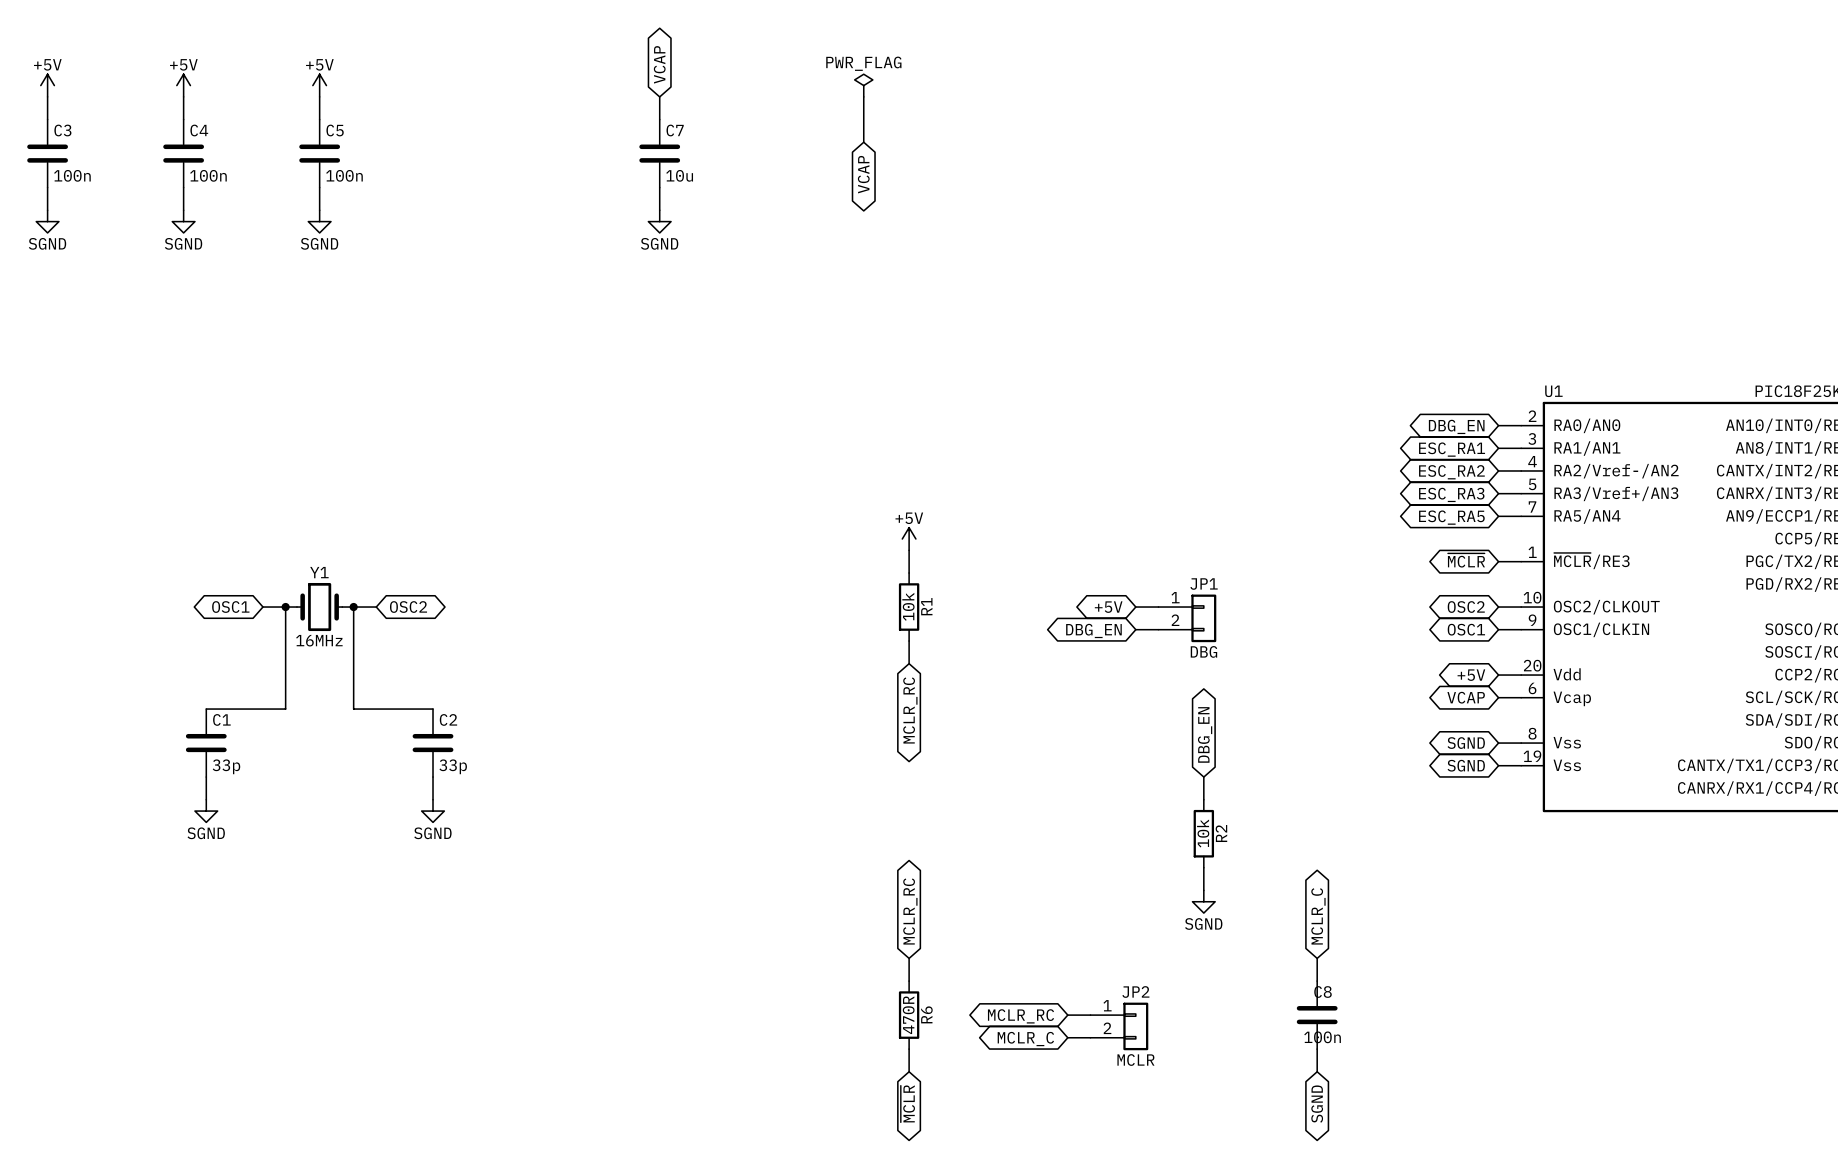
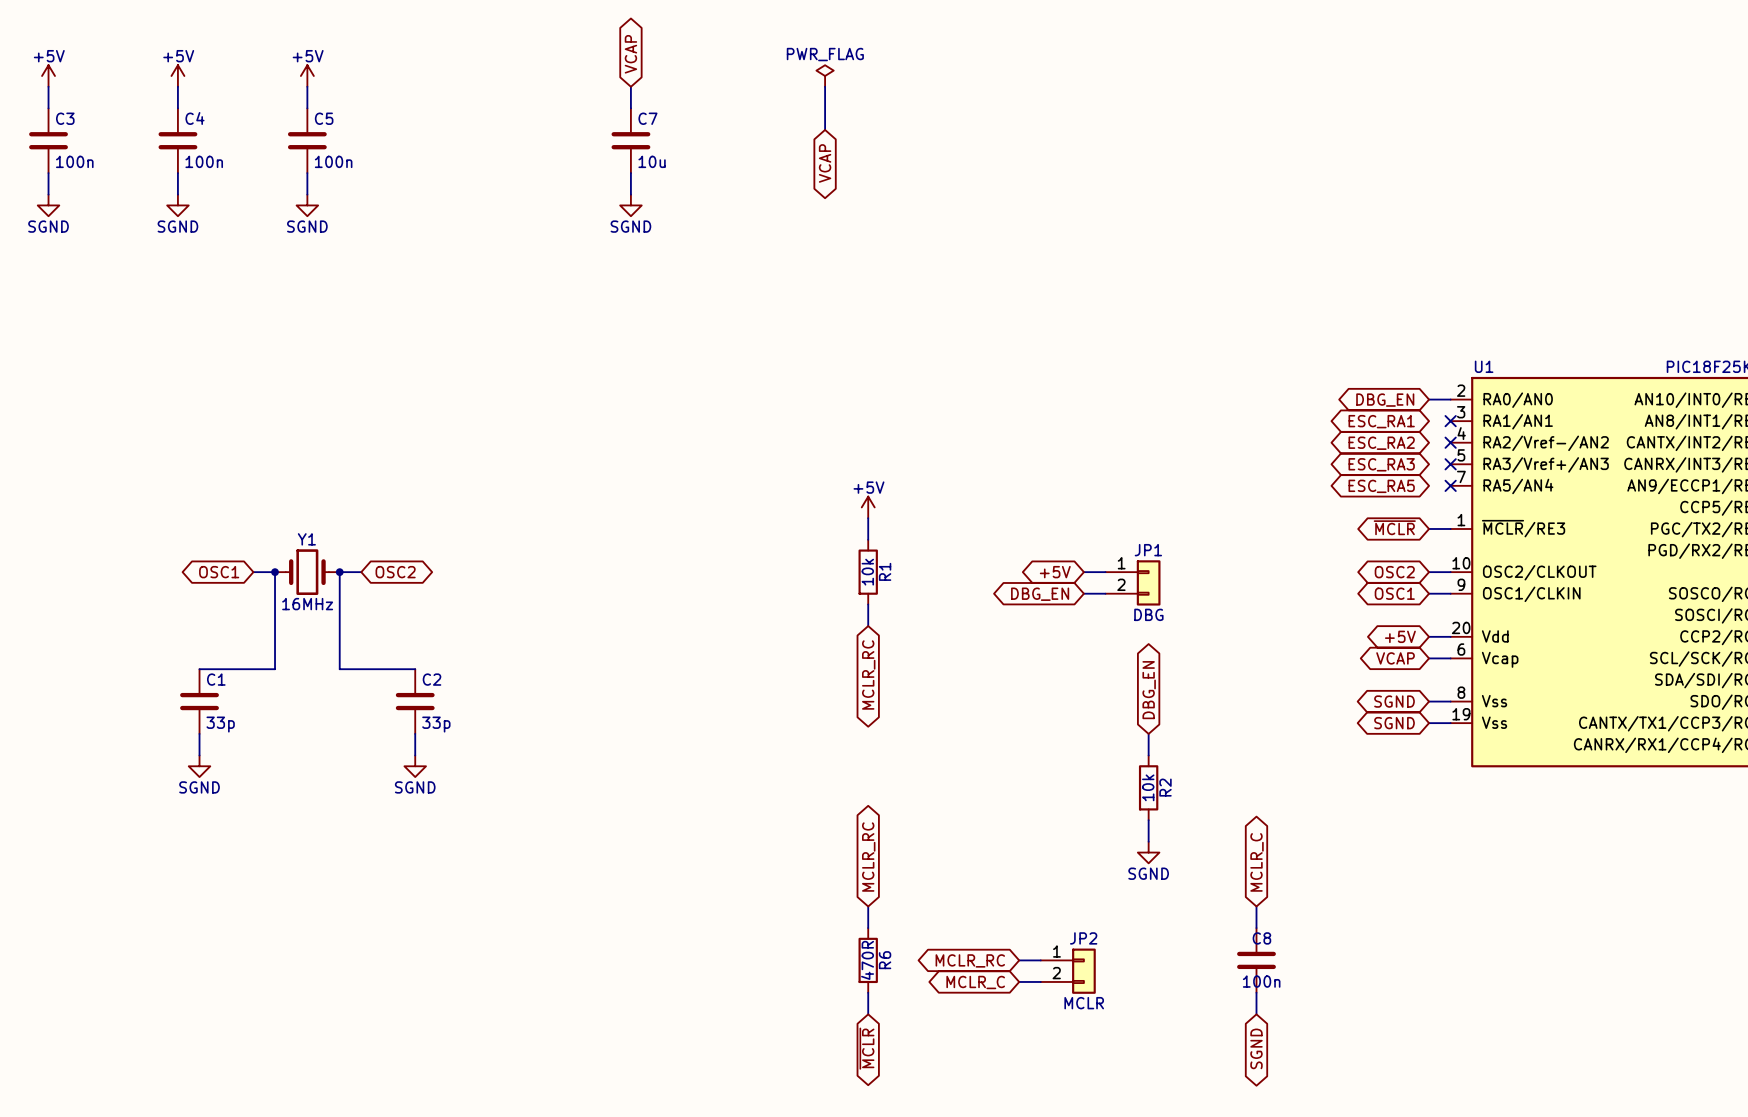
wire: (1498, 448) (1521, 448) -> none
no-connect mark: none -> (1450, 421)
wire: (1498, 470) (1521, 470) -> none
no-connect mark: none -> (1450, 442)
wire: (1498, 493) (1521, 493) -> none
no-connect mark: none -> (1450, 464)
wire: (1498, 516) (1521, 516) -> none
no-connect mark: none -> (1450, 485)

